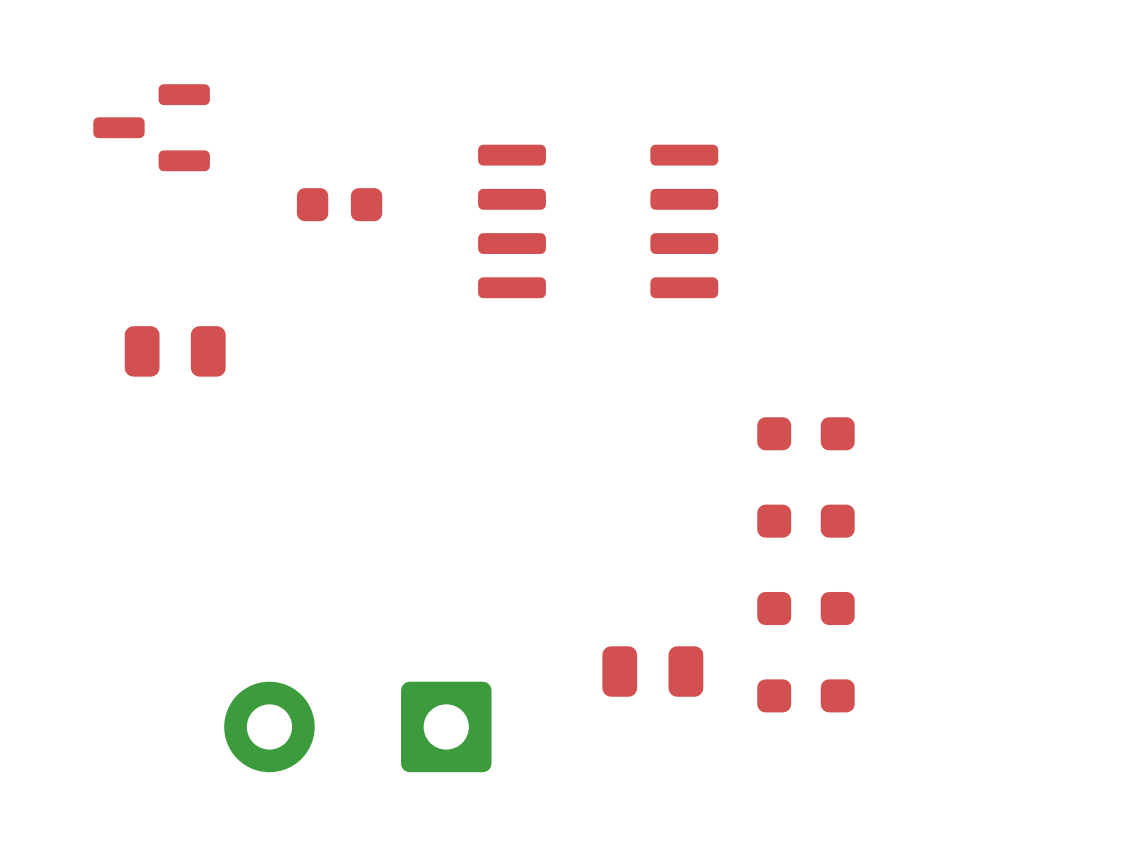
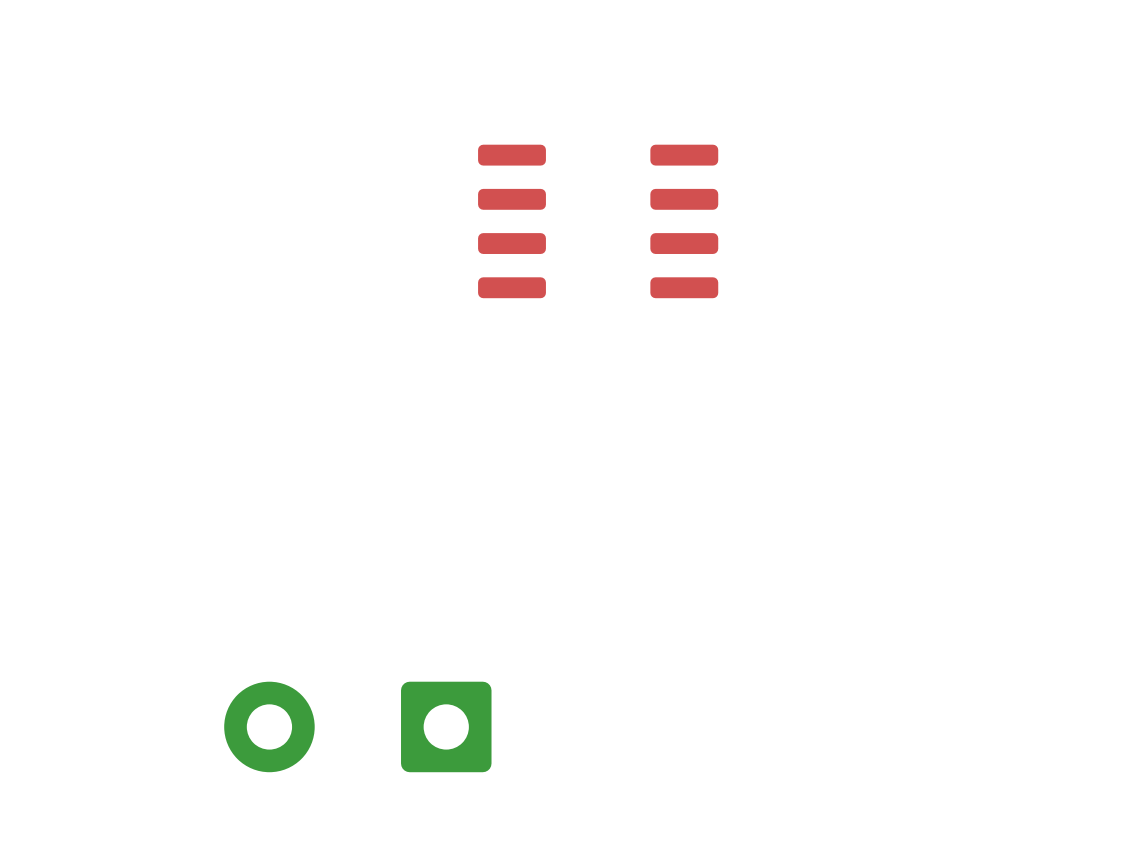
part: (151, 127) -> none
part: (339, 204) -> none
part: (175, 351) -> none
part: (805, 433) -> none
part: (805, 521) -> none
part: (805, 608) -> none
part: (652, 671) -> none
part: (805, 695) -> none

